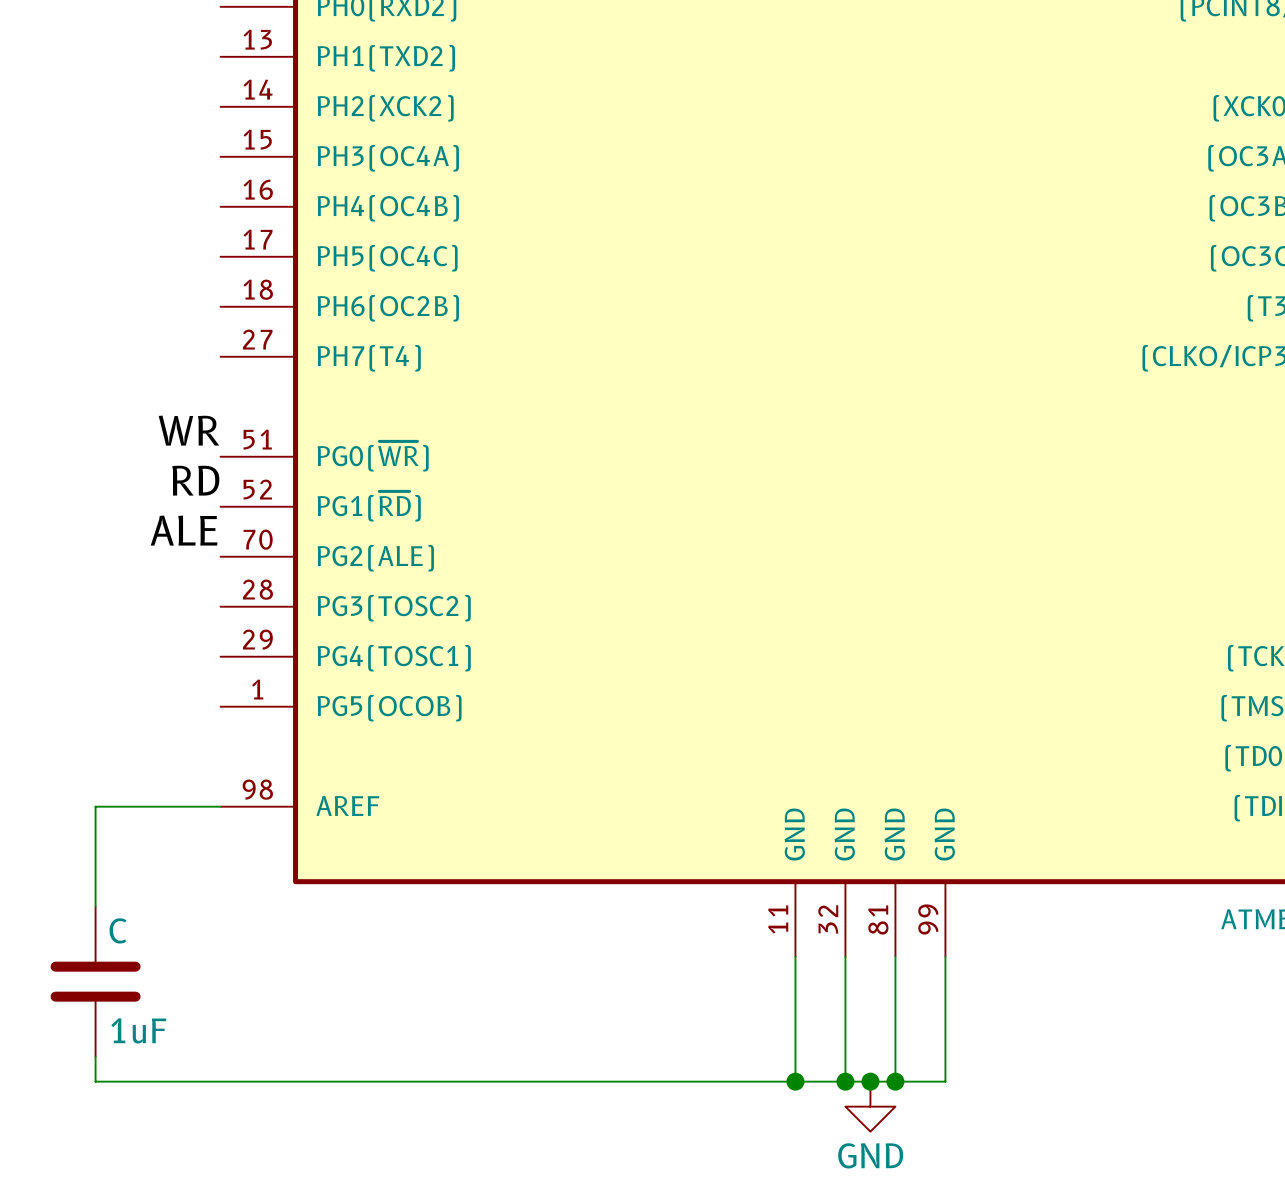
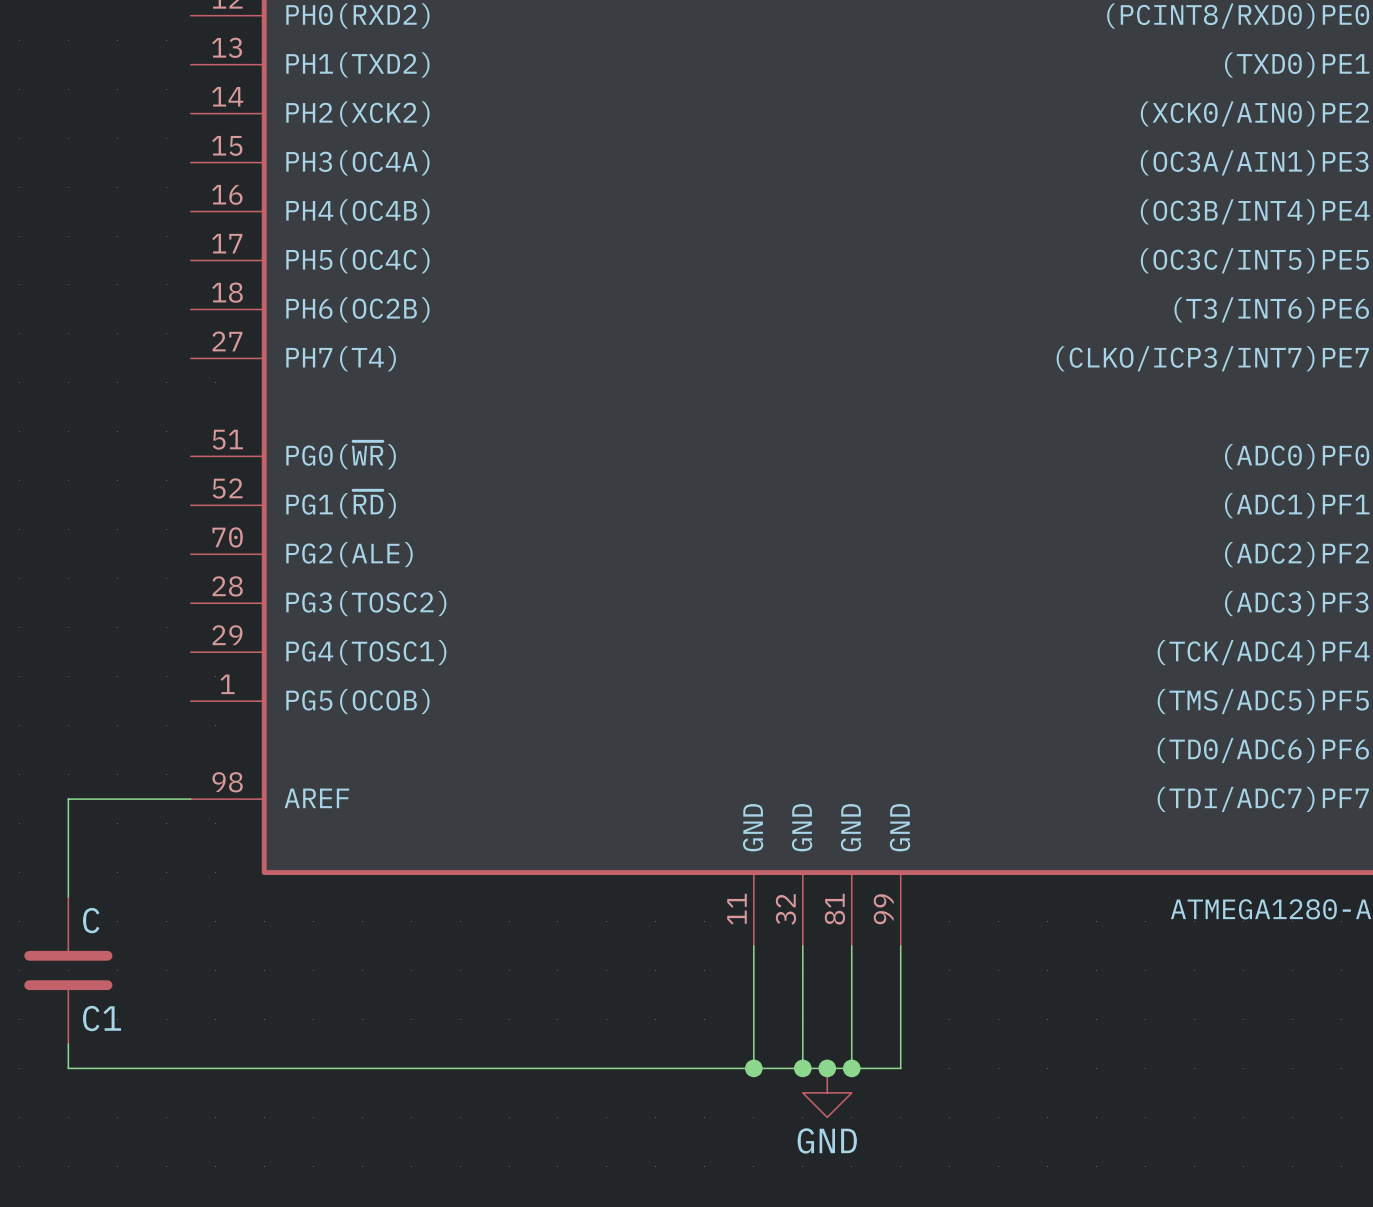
label: WR (188, 430) -> none
label: RD (195, 480) -> none
label: ALE (184, 530) -> none
C value: 1uF (138, 1030) -> C1 (102, 1018)

